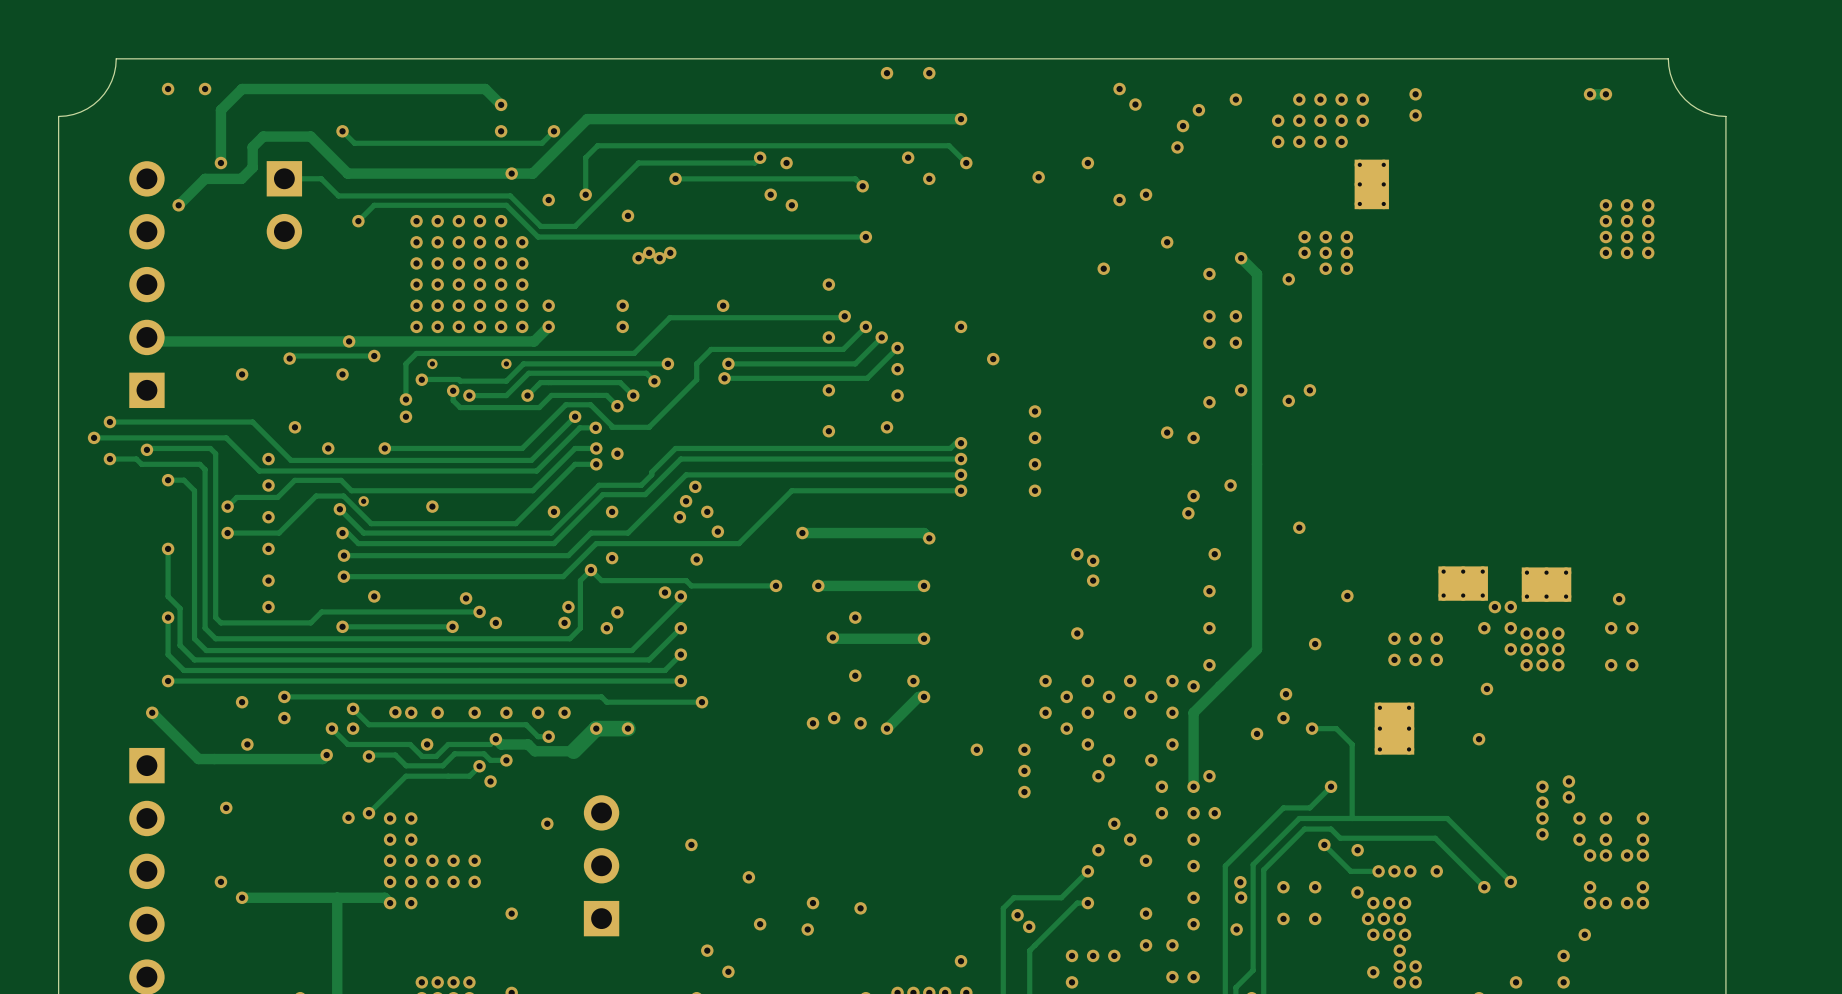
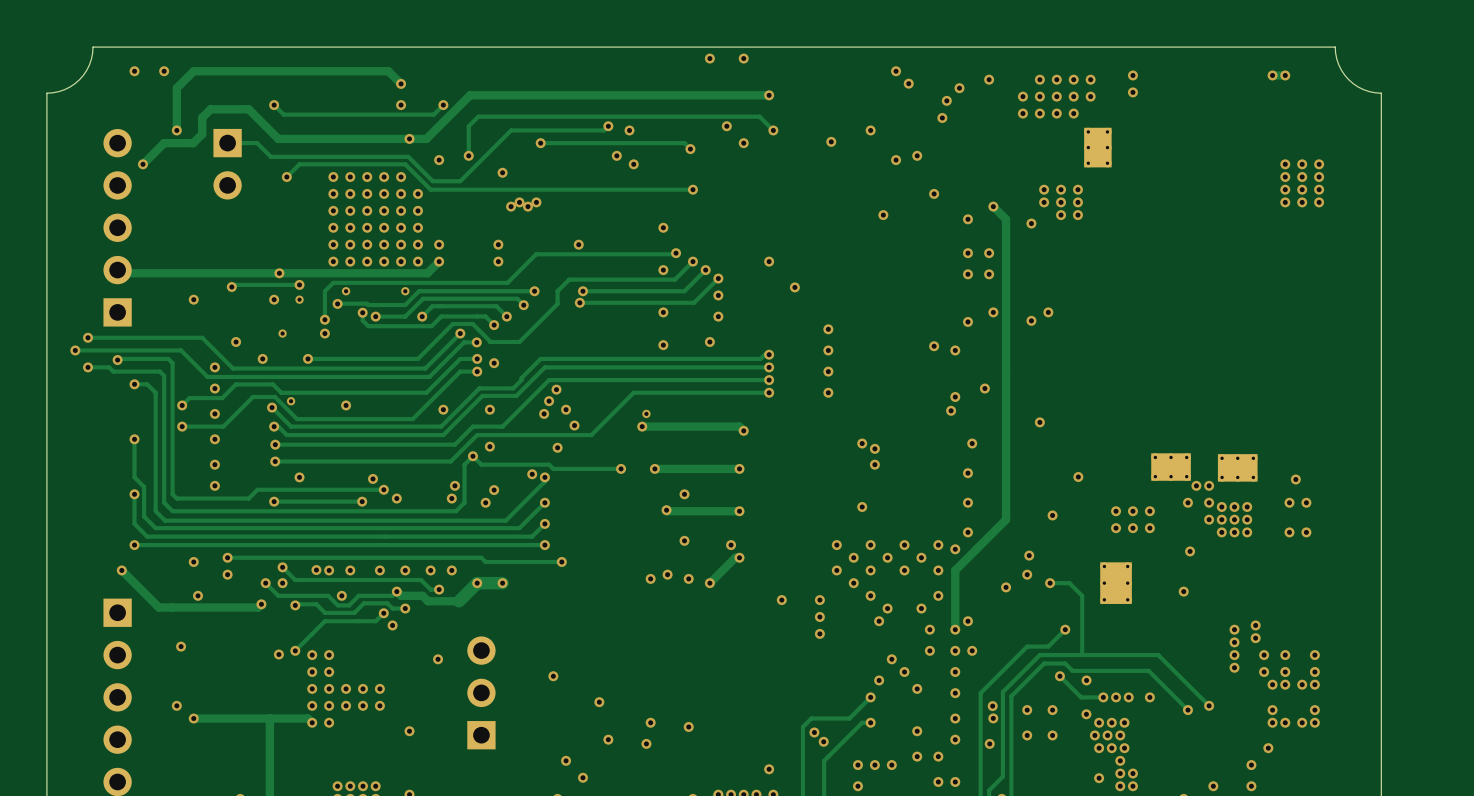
via: none -> (299, 299)
via: none -> (282, 333)
via: none -> (646, 413)

